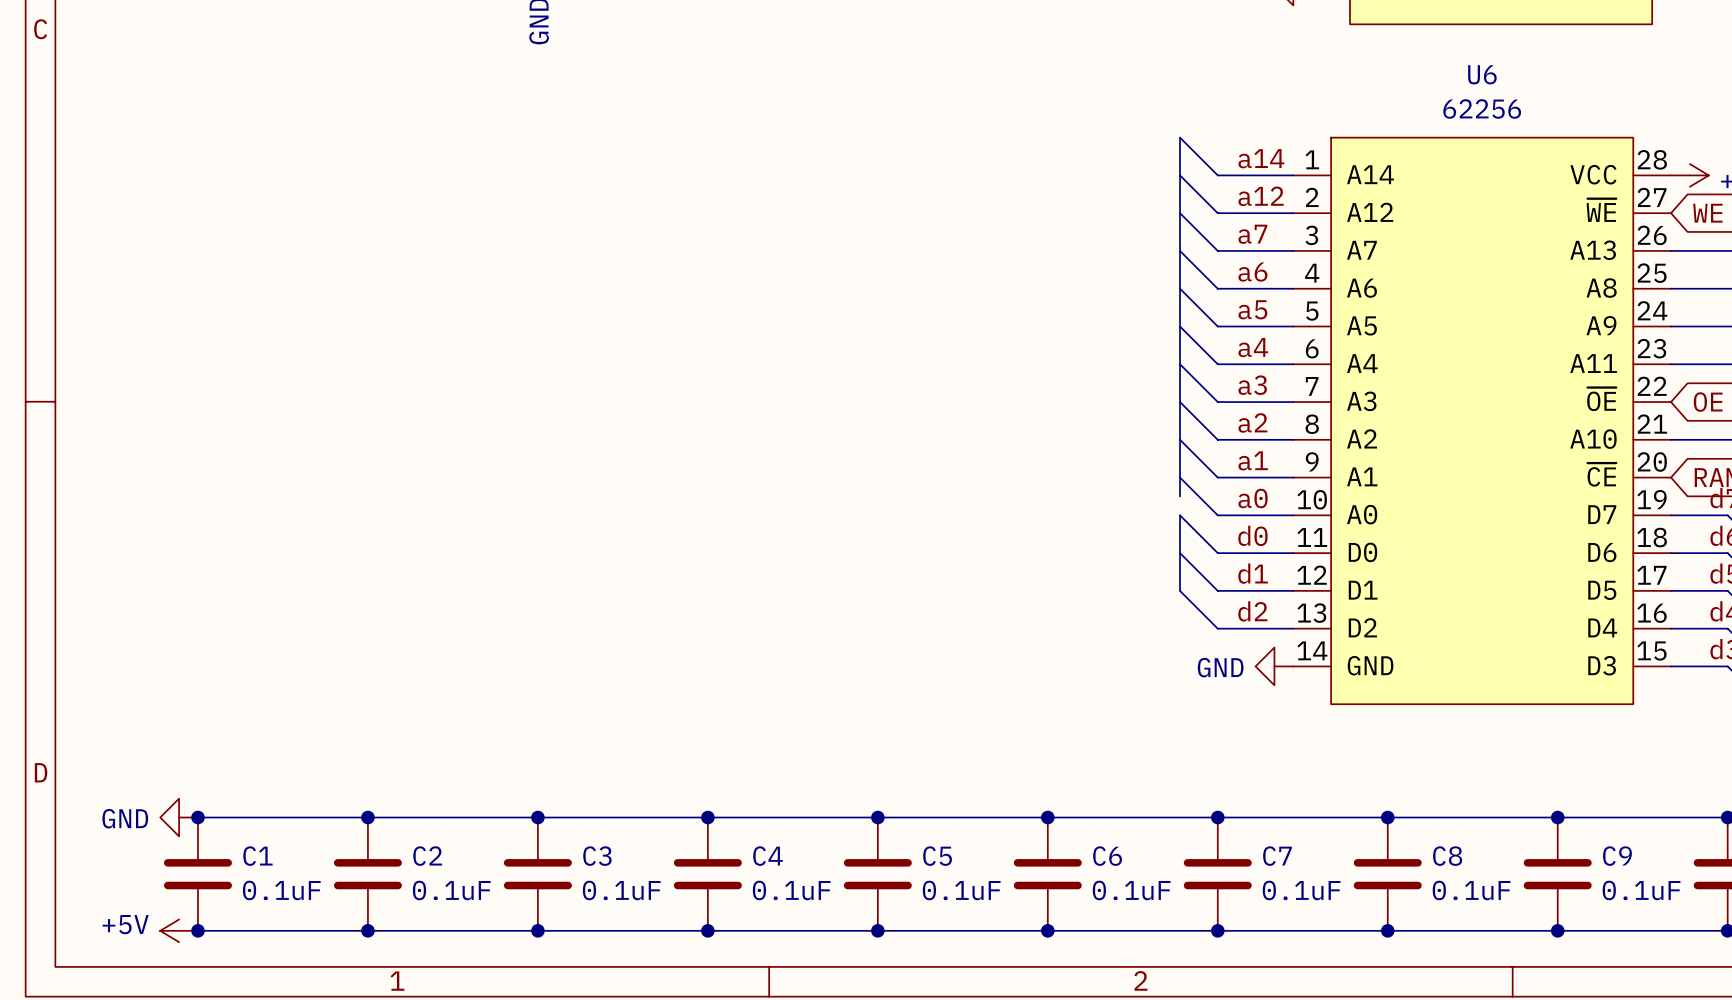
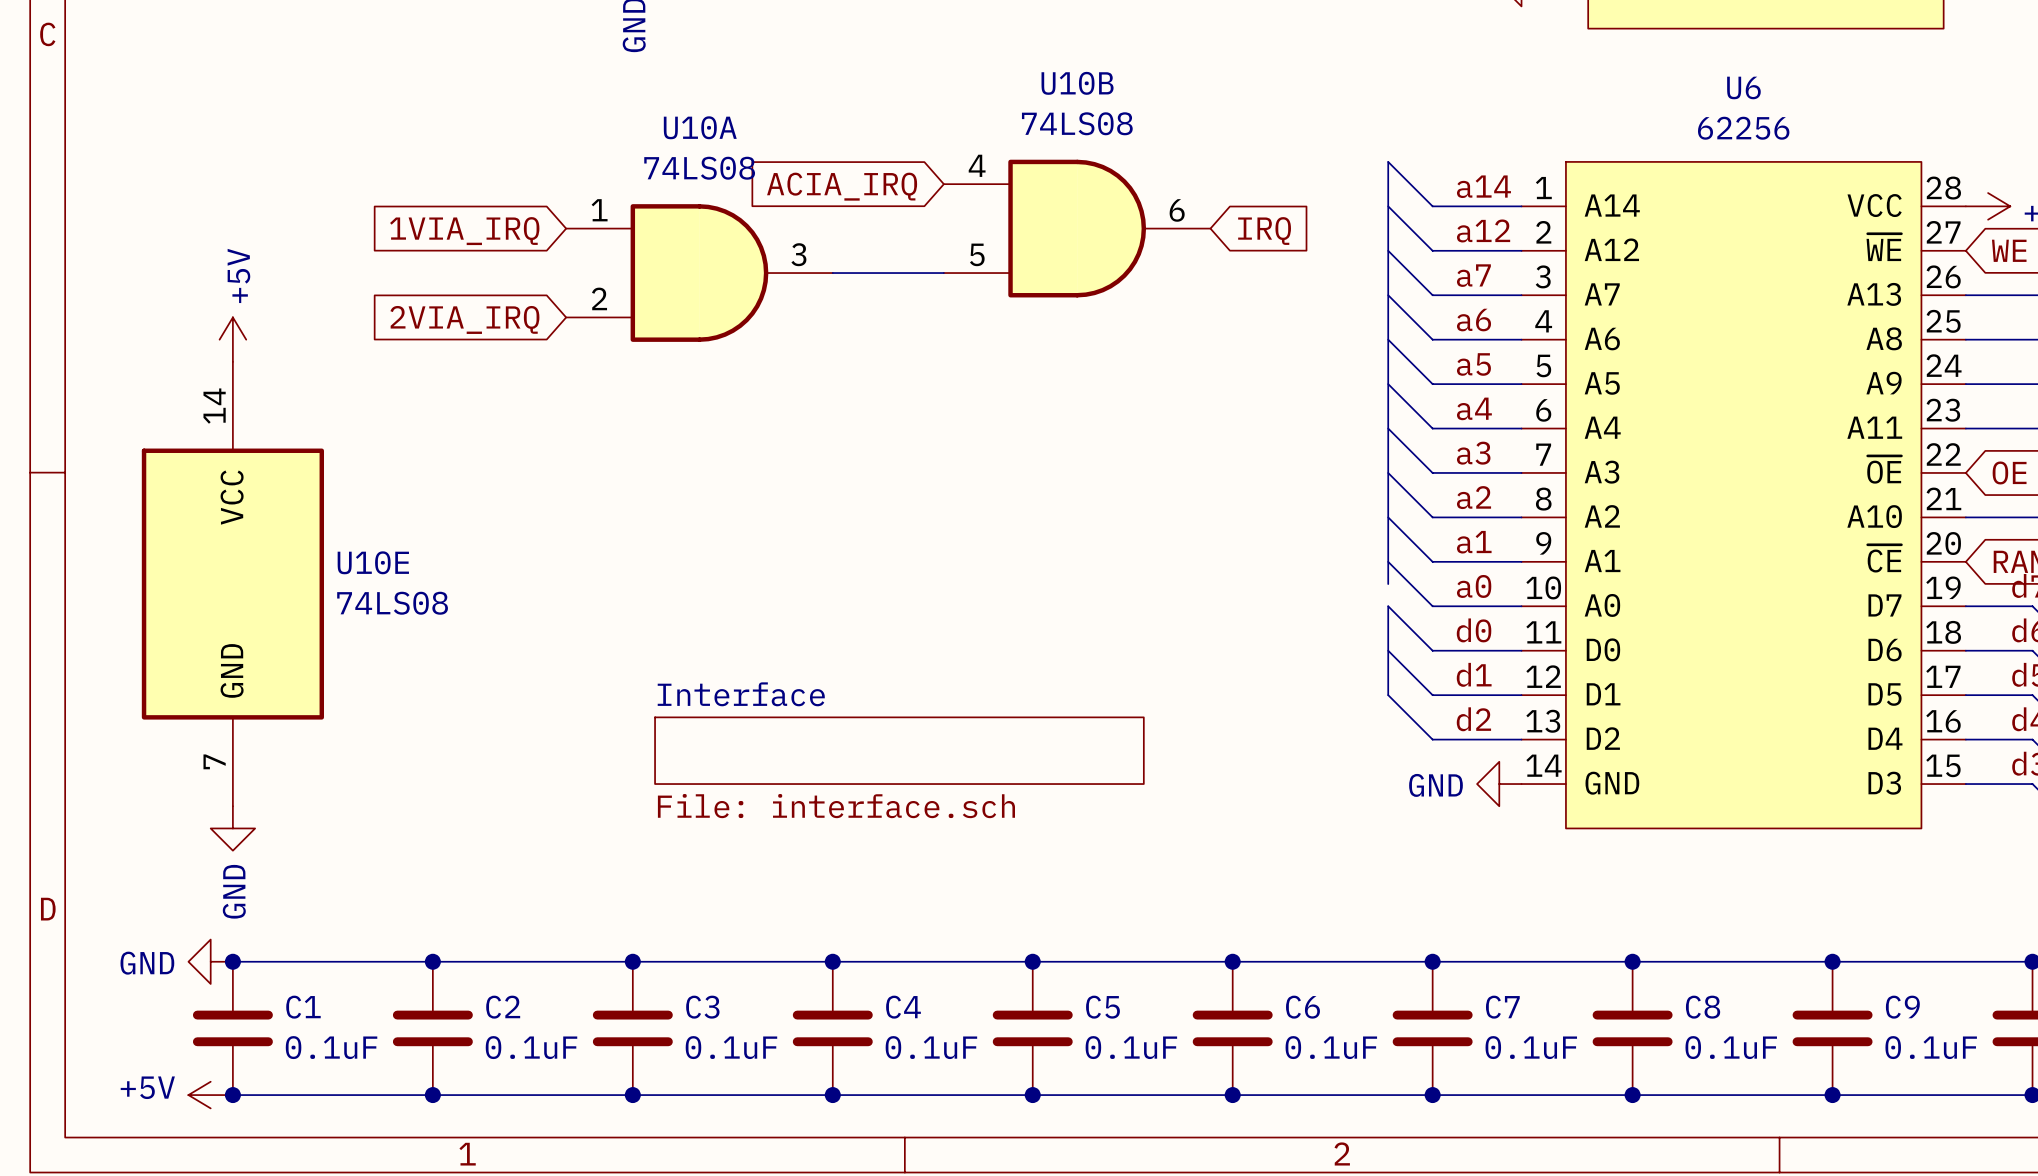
global label: none -> ACIA_IRQ (842, 186)
U10B: none -> 74LS08 (1077, 228)
global label: none -> 1VIA_IRQ (464, 231)
global label: none -> IRQ (1264, 231)
U10A: none -> 74LS08 (699, 273)
wire: none -> (832, 273) (943, 273)
global label: none -> 2VIA_IRQ (464, 319)
power symbol: none -> +5V (232, 339)
U10E: none -> 74LS08 (232, 584)
sheet Interface: none -> File: interface.sch (899, 750)
power symbol: none -> GND (232, 828)

